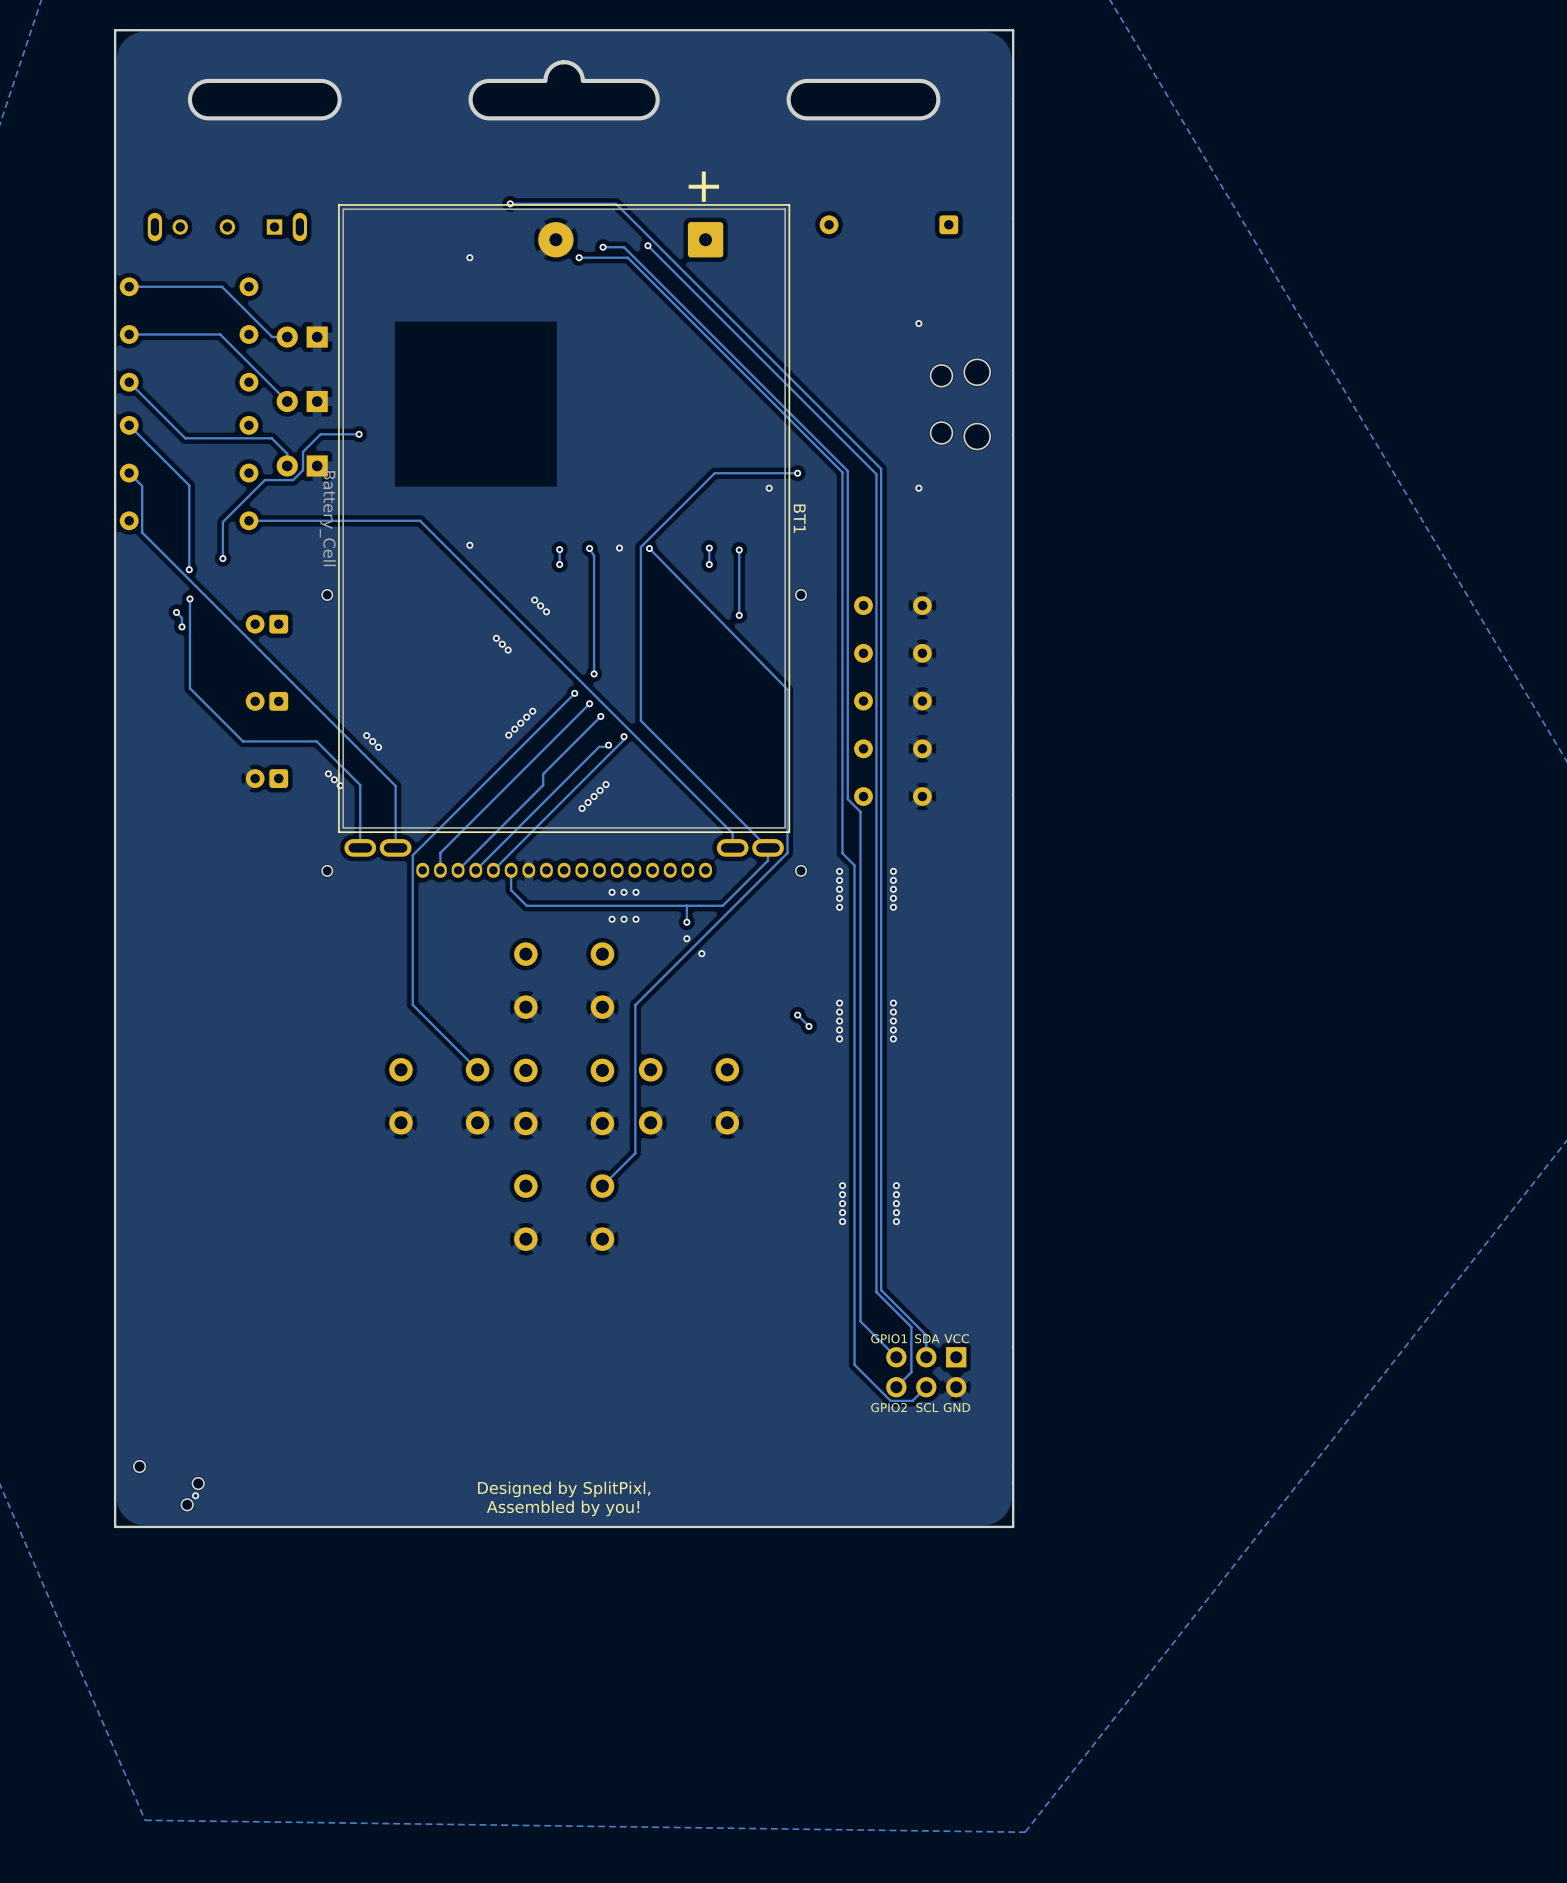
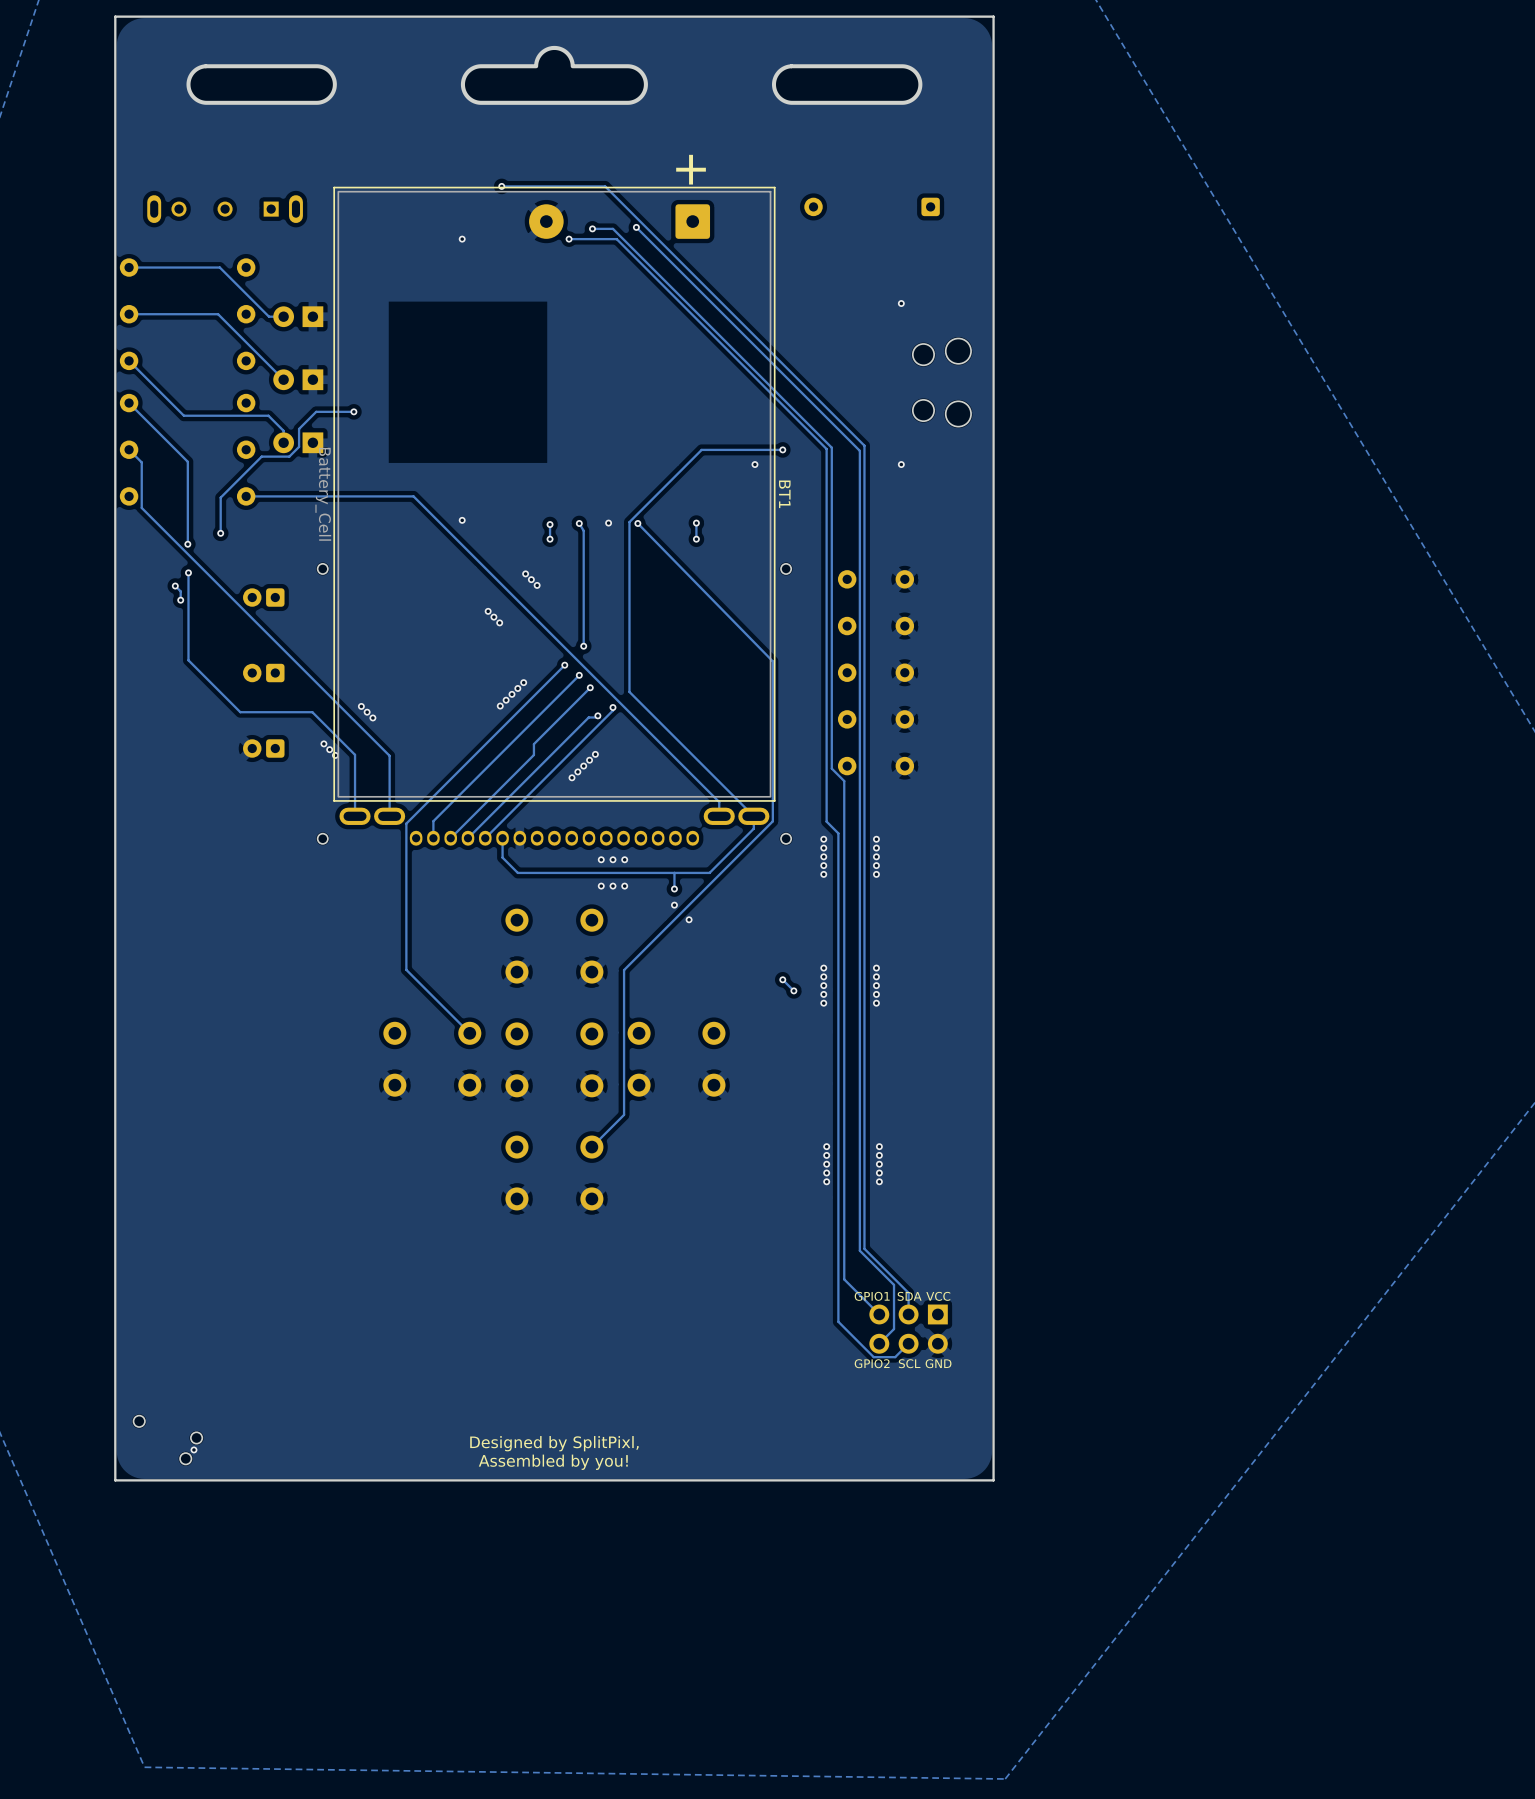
track: (739, 549) (739, 615) -> none
via: (739, 549) -> none
via: (739, 615) -> none

